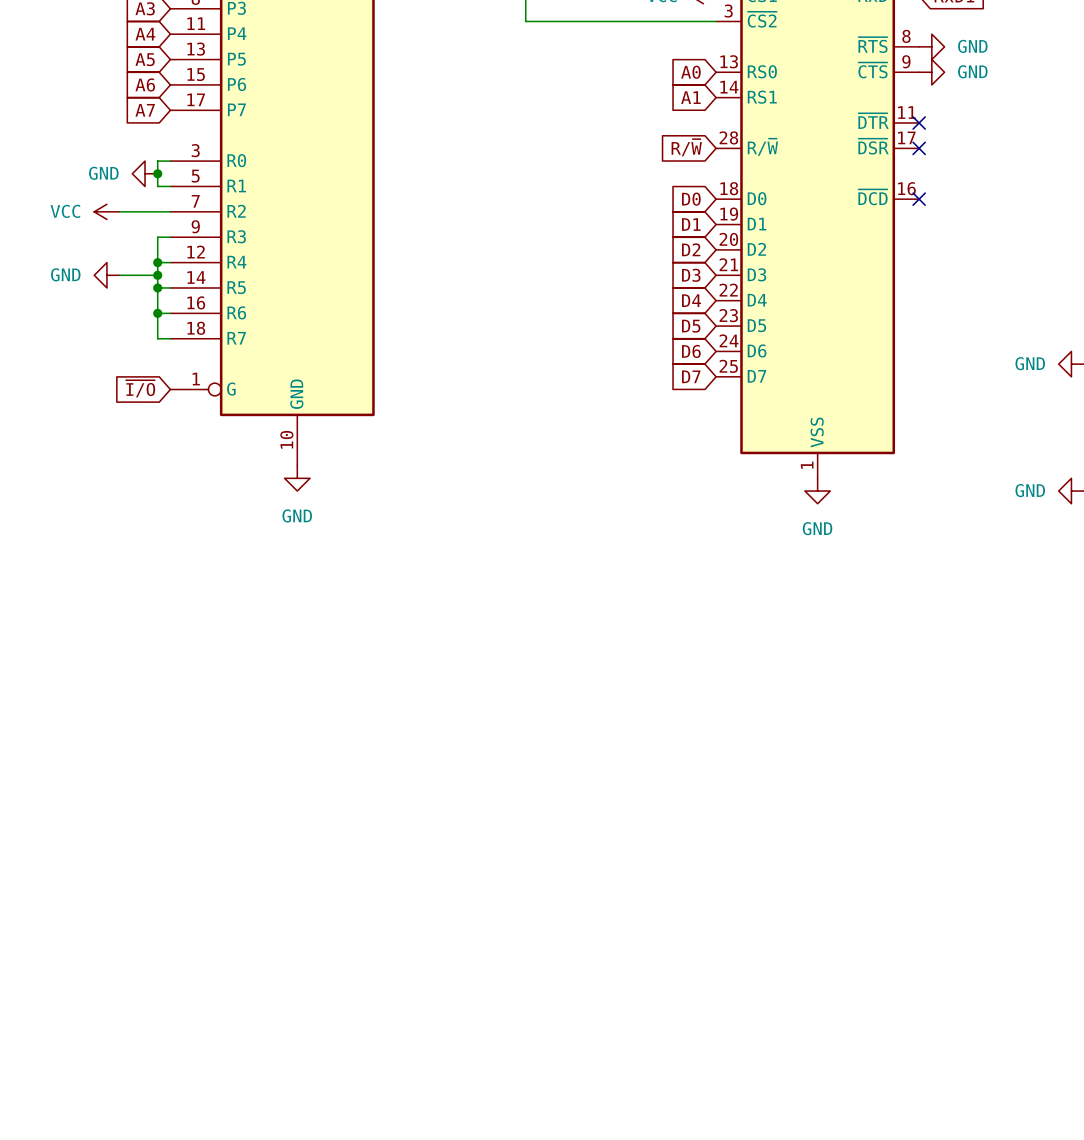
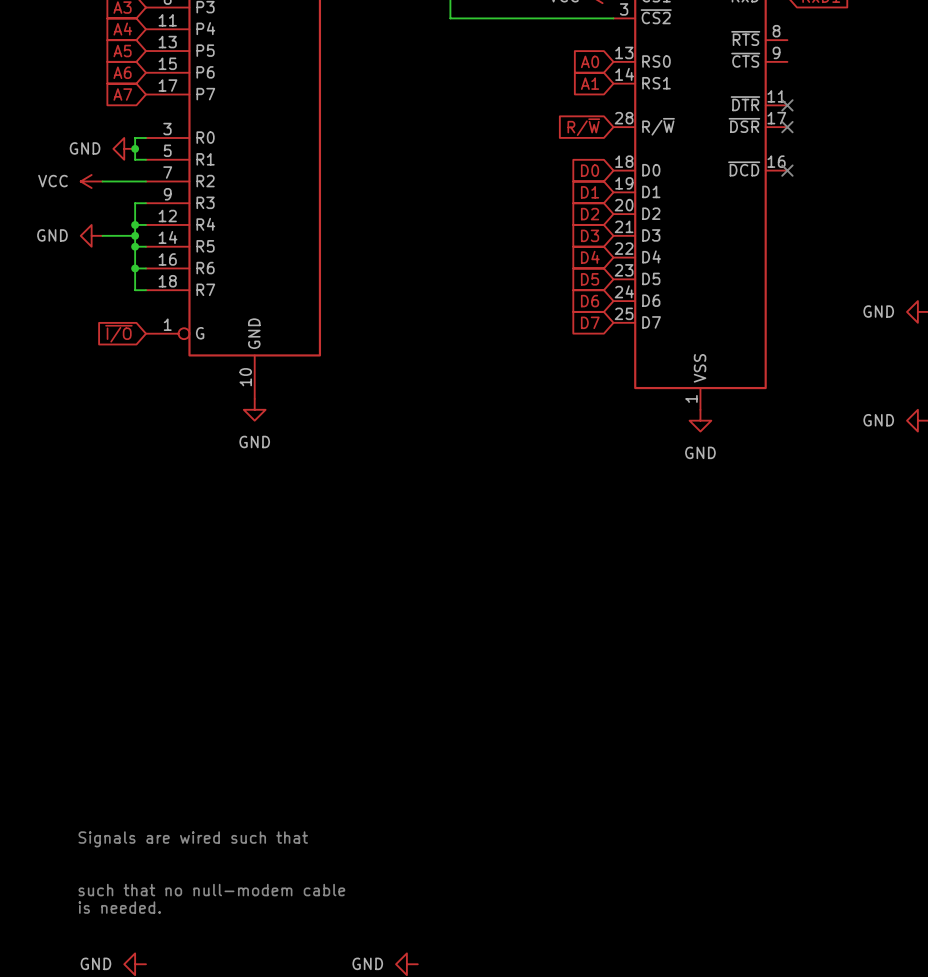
power symbol: GND (931, 46) -> none
power symbol: GND (931, 72) -> none
text: none -> Signals are wired such that (193, 839)
text: none -> such that no null-modem cable (211, 890)
text: none -> is needed. (119, 907)
power symbol: none -> GND (135, 964)
power symbol: none -> GND (406, 964)

